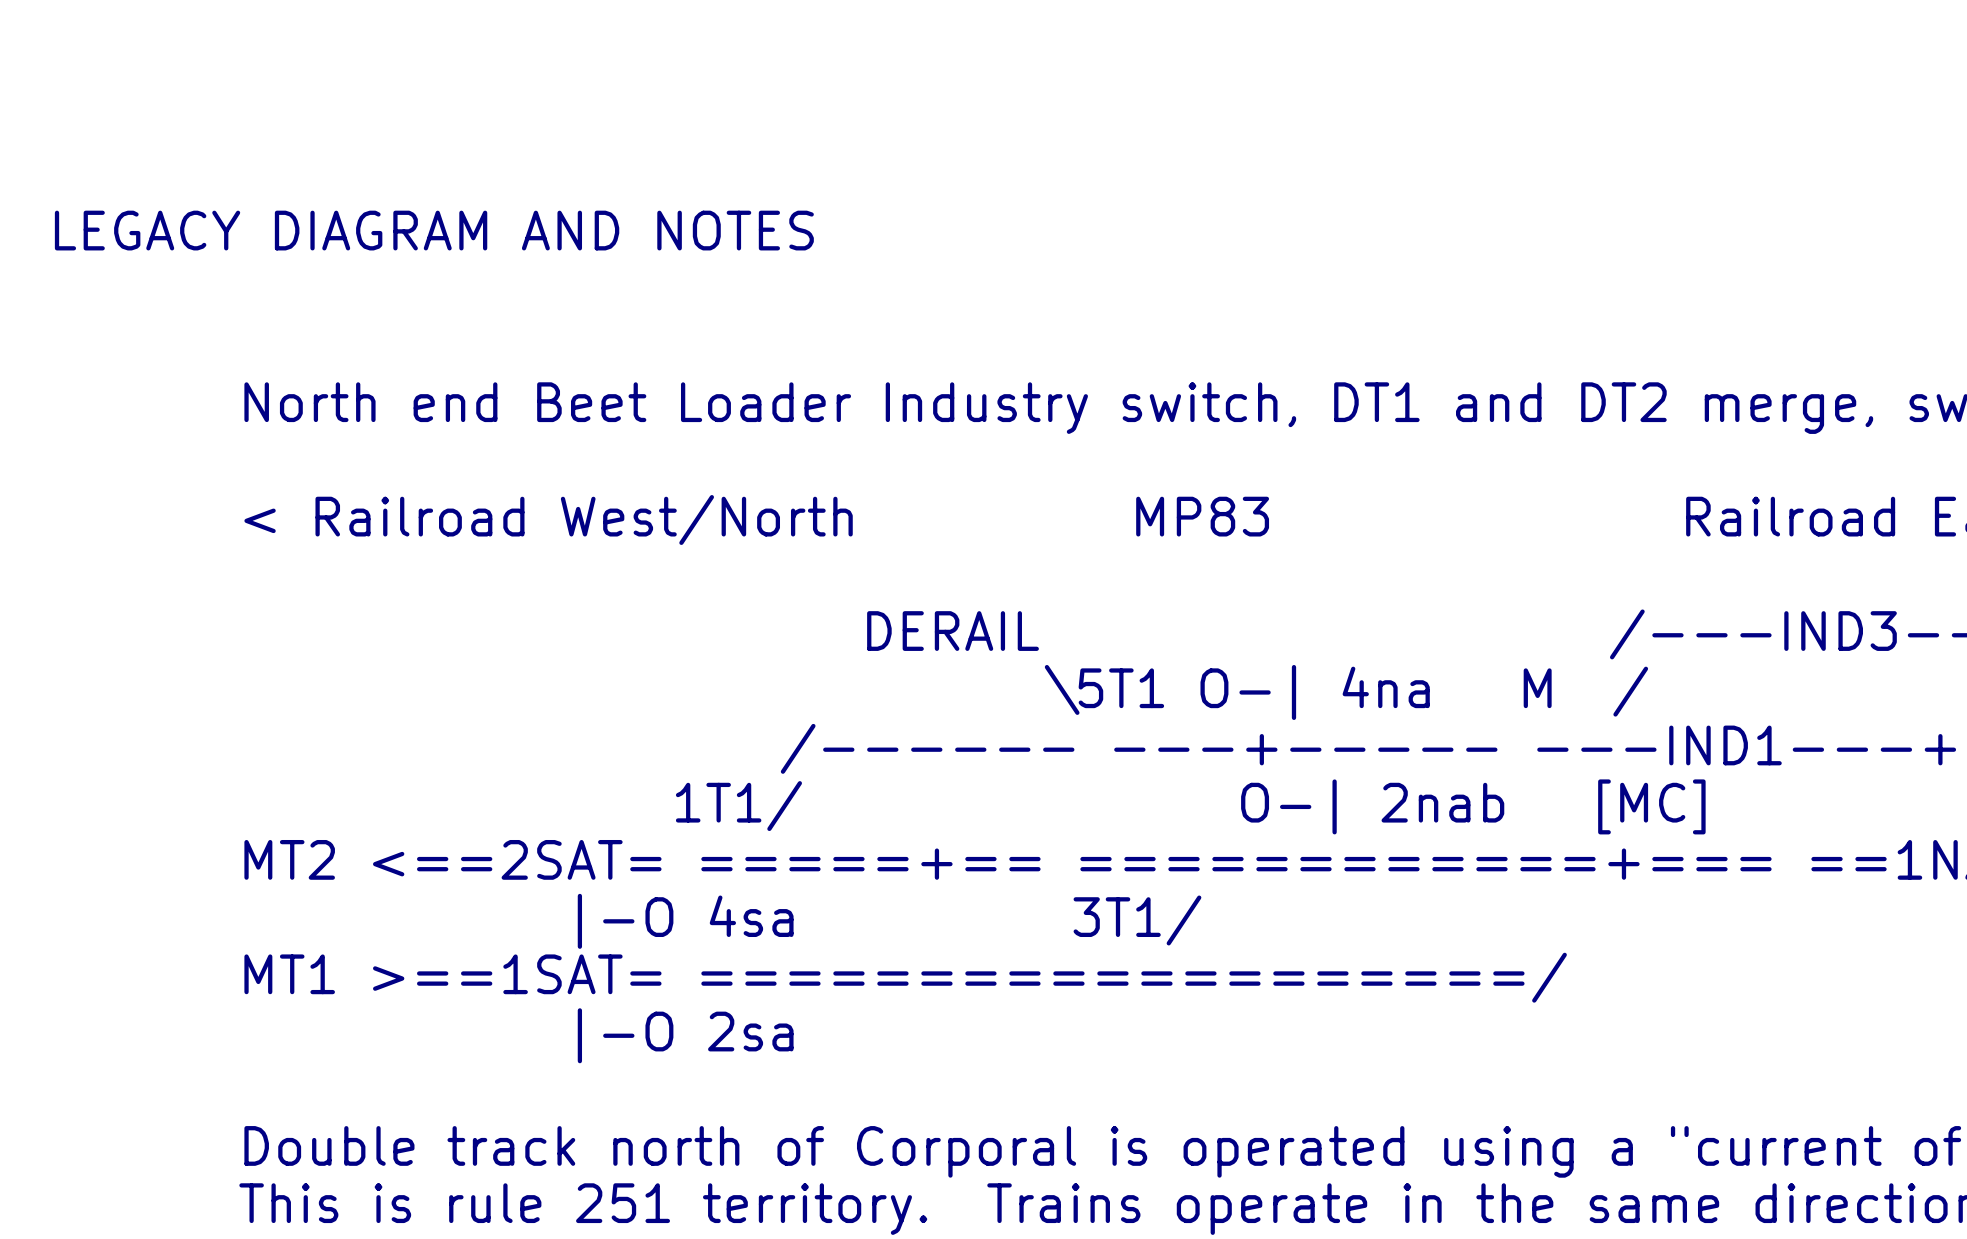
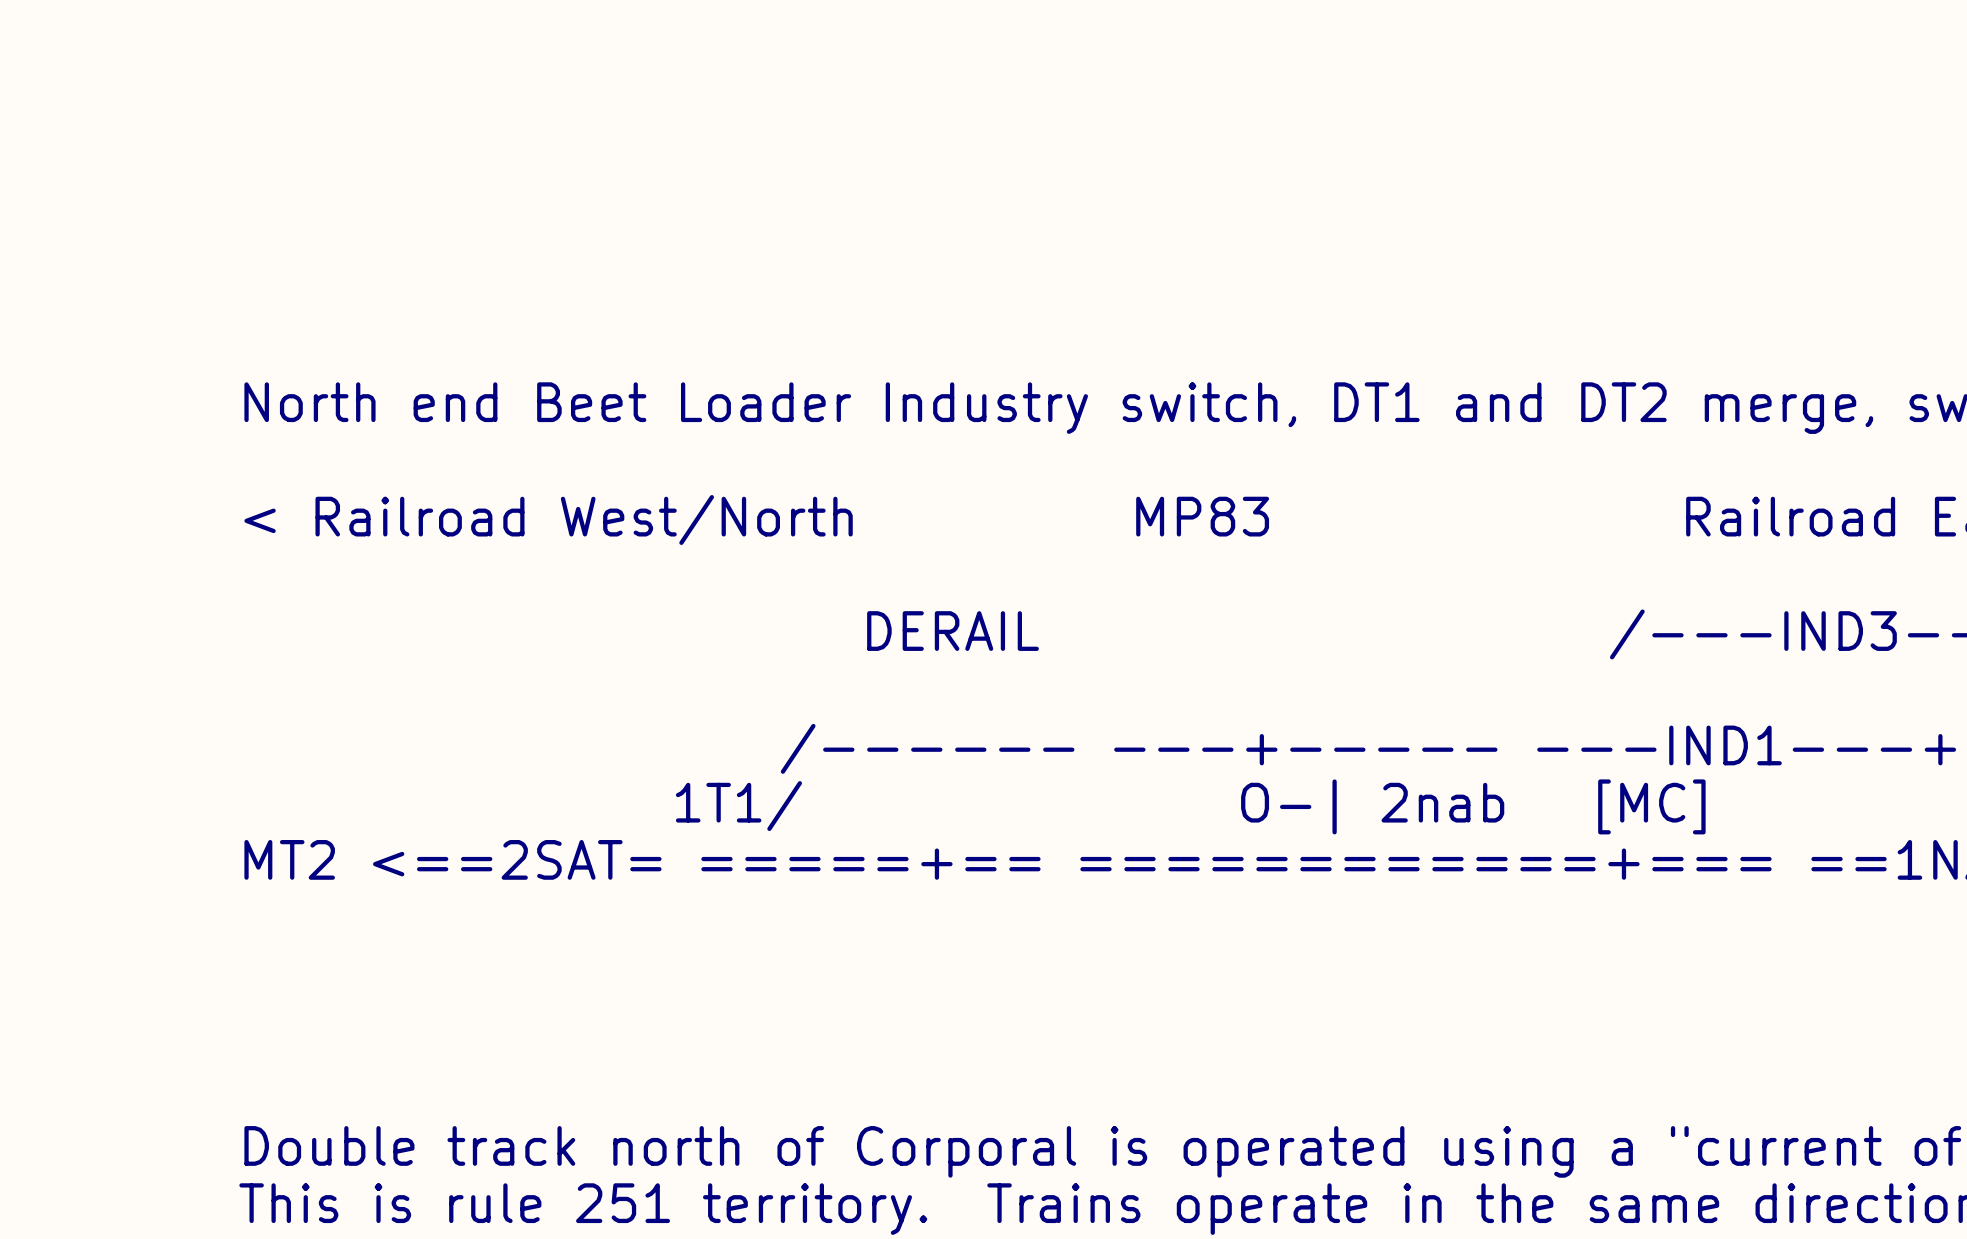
text: LEGACY DIAGRAM AND NOTES (434, 230) -> none
text: \5T1 O-| 4na M / (1346, 692) -> none
text: |-O 4sa 3T1/ (889, 921) -> none
text: MT1 >==1SAT= ===================/ (905, 977) -> none
text: |-O 2sa (685, 1035) -> none

